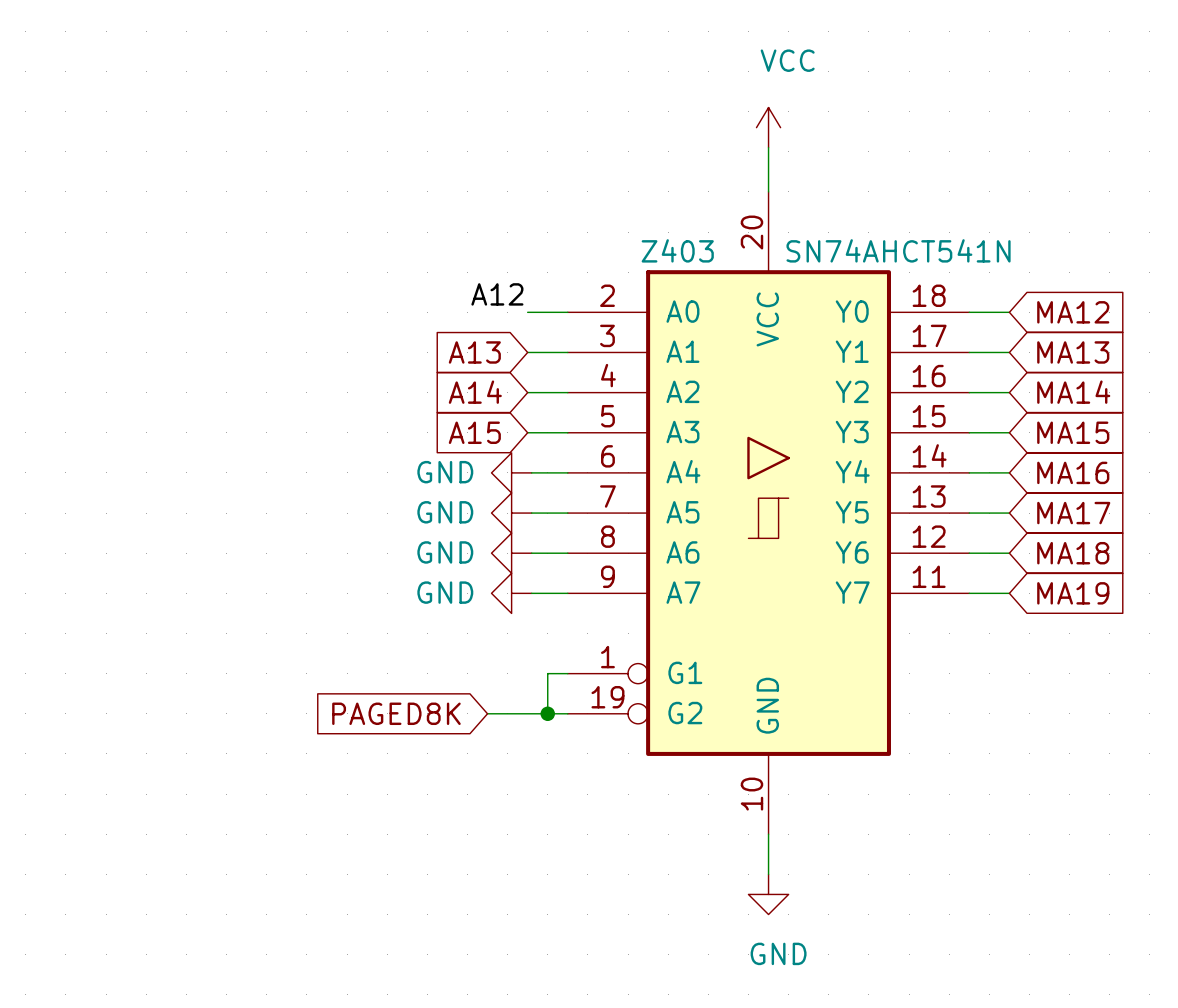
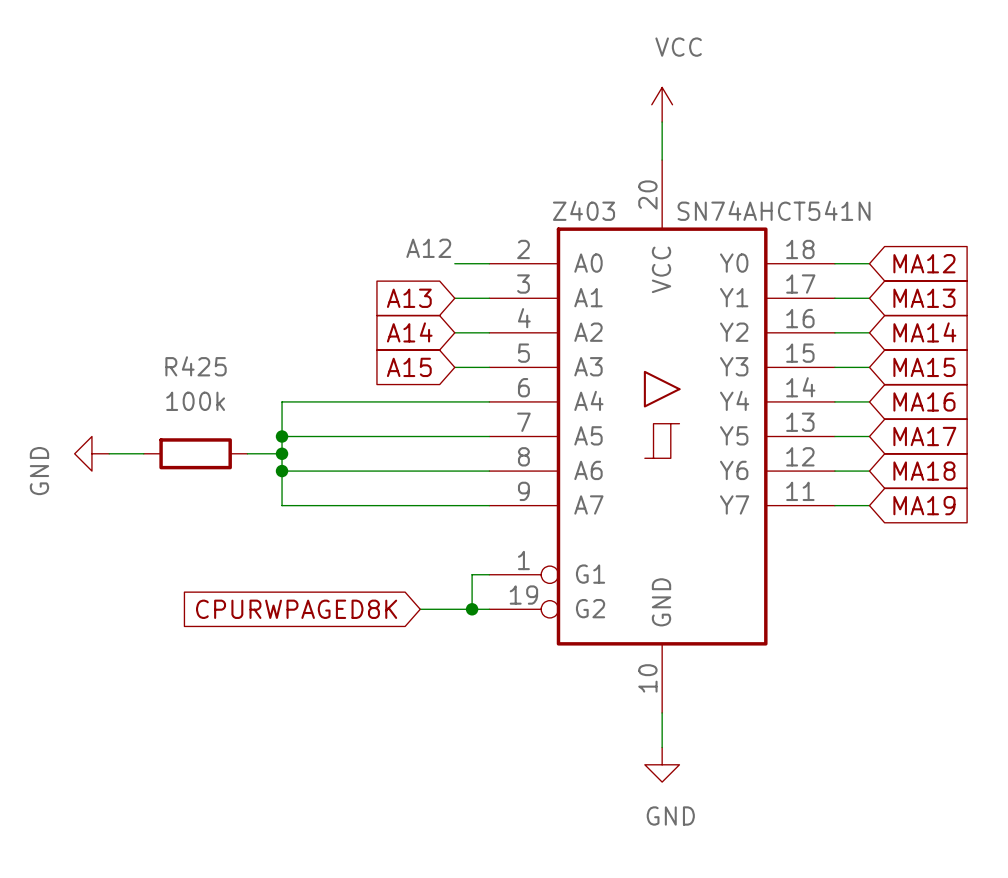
power symbol: GND (511, 472) -> none
wire: none -> (458, 401) (282, 401) (282, 505) (458, 505)
wire: none -> (282, 436) (458, 436)
junction: none -> (282, 436)
power symbol: GND (511, 513) -> none
power symbol: none -> GND (91, 453)
wire: none -> (109, 453) (143, 453)
R425: none -> 100k (195, 453)
wire: none -> (247, 453) (282, 453)
junction: none -> (282, 453)
wire: none -> (282, 471) (458, 471)
junction: none -> (282, 471)
power symbol: GND (511, 553) -> none
power symbol: GND (511, 593) -> none
global label: PAGED8K (396, 713) -> CPURWPAGED8K (296, 609)

